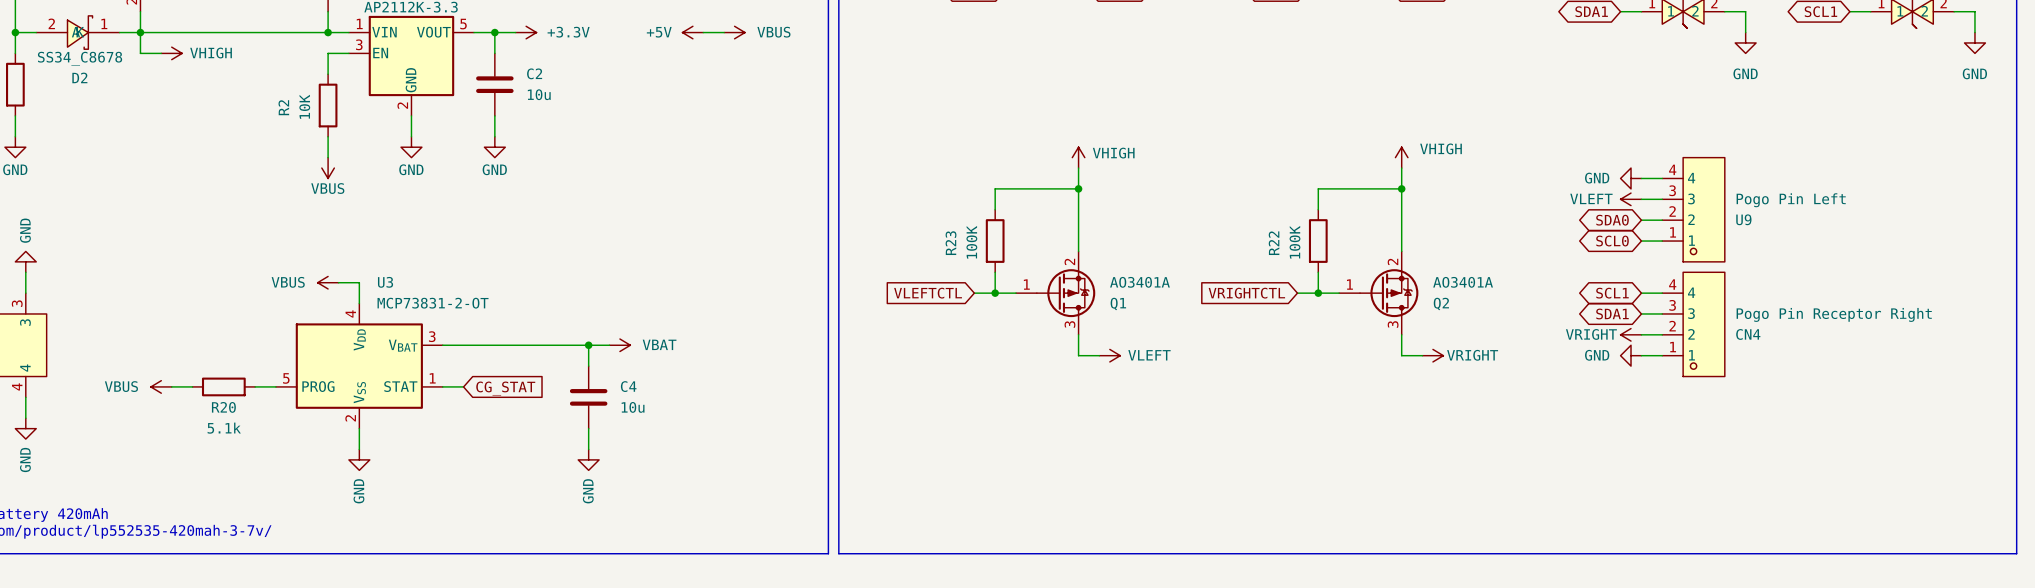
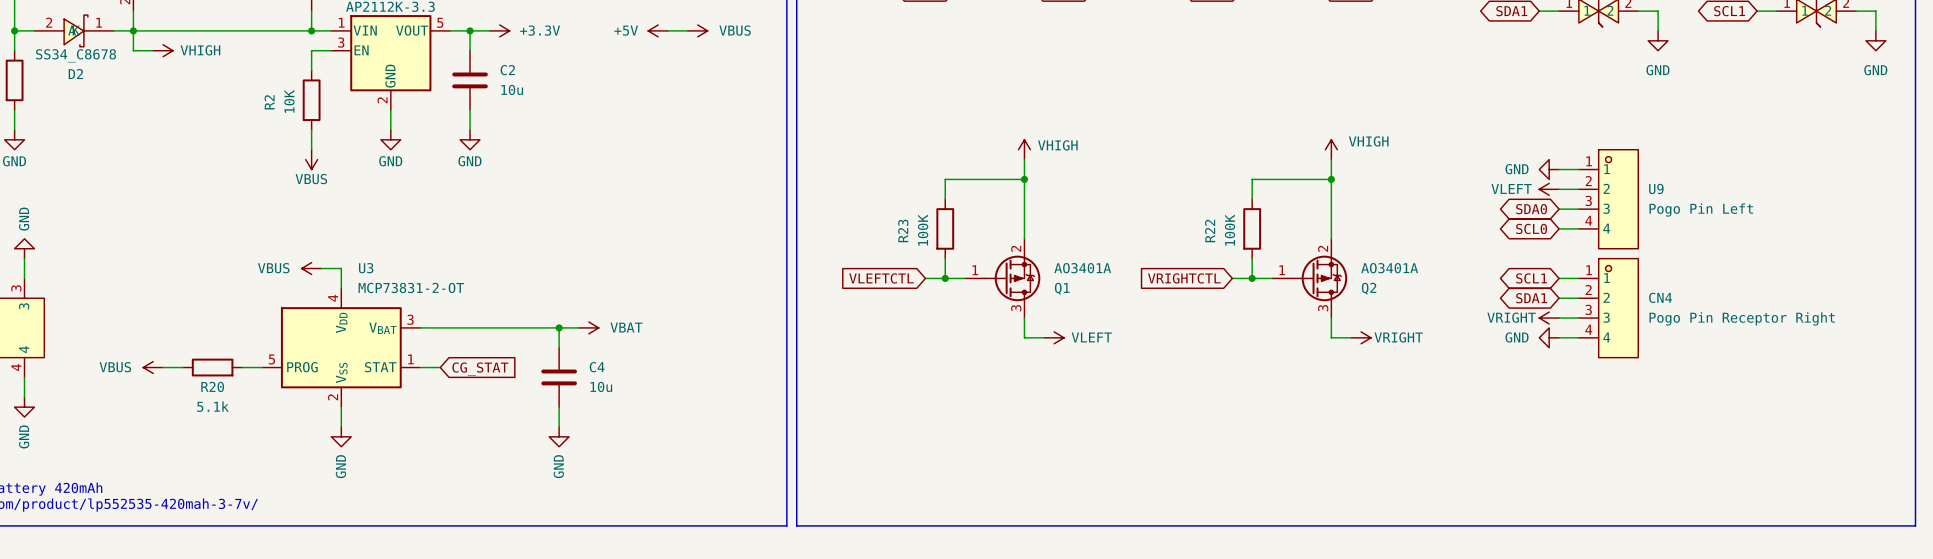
U9 flip: as is (1703, 209) -> up-down (1618, 199)
CN4 flip: as is (1703, 324) -> up-down (1618, 308)

